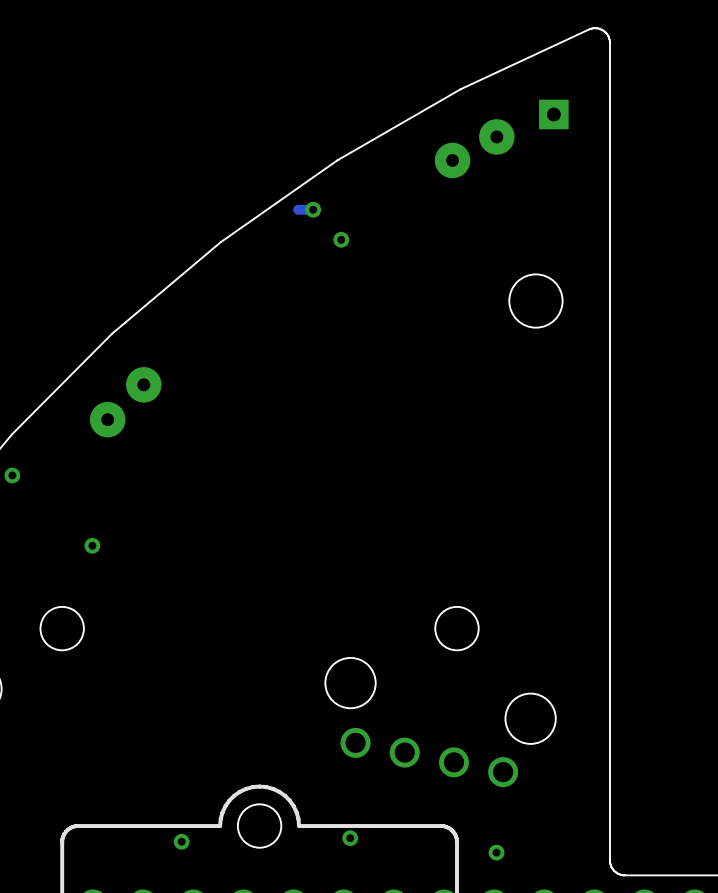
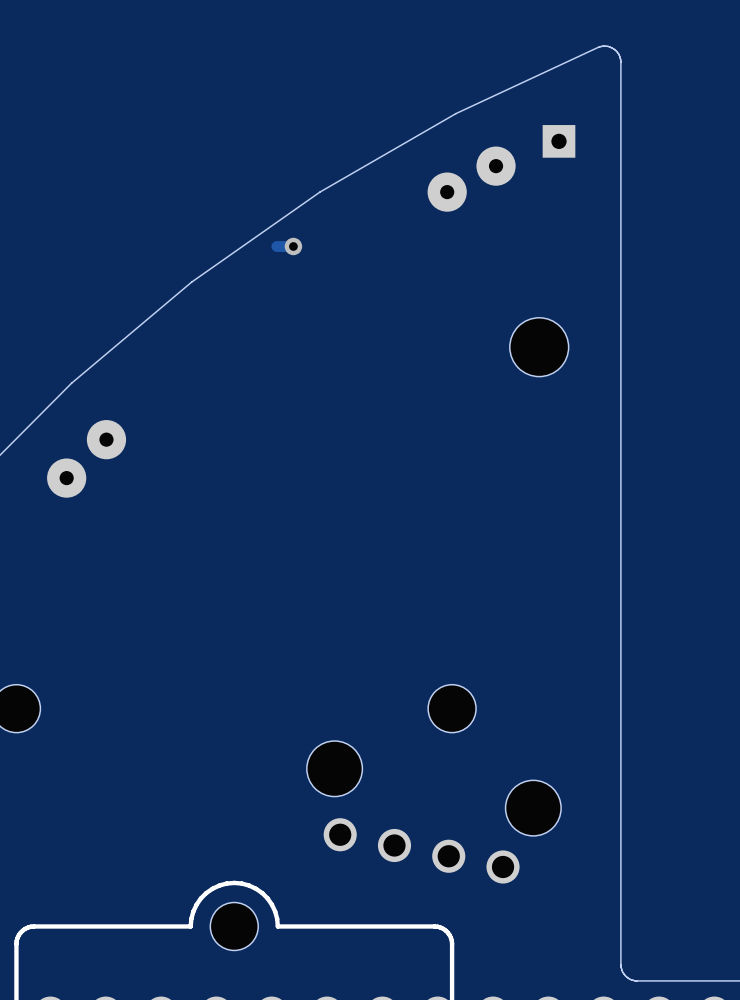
via: (341, 239) -> none
via: (92, 545) -> none
via: (350, 838) -> none
via: (181, 841) -> none
via: (496, 852) -> none

